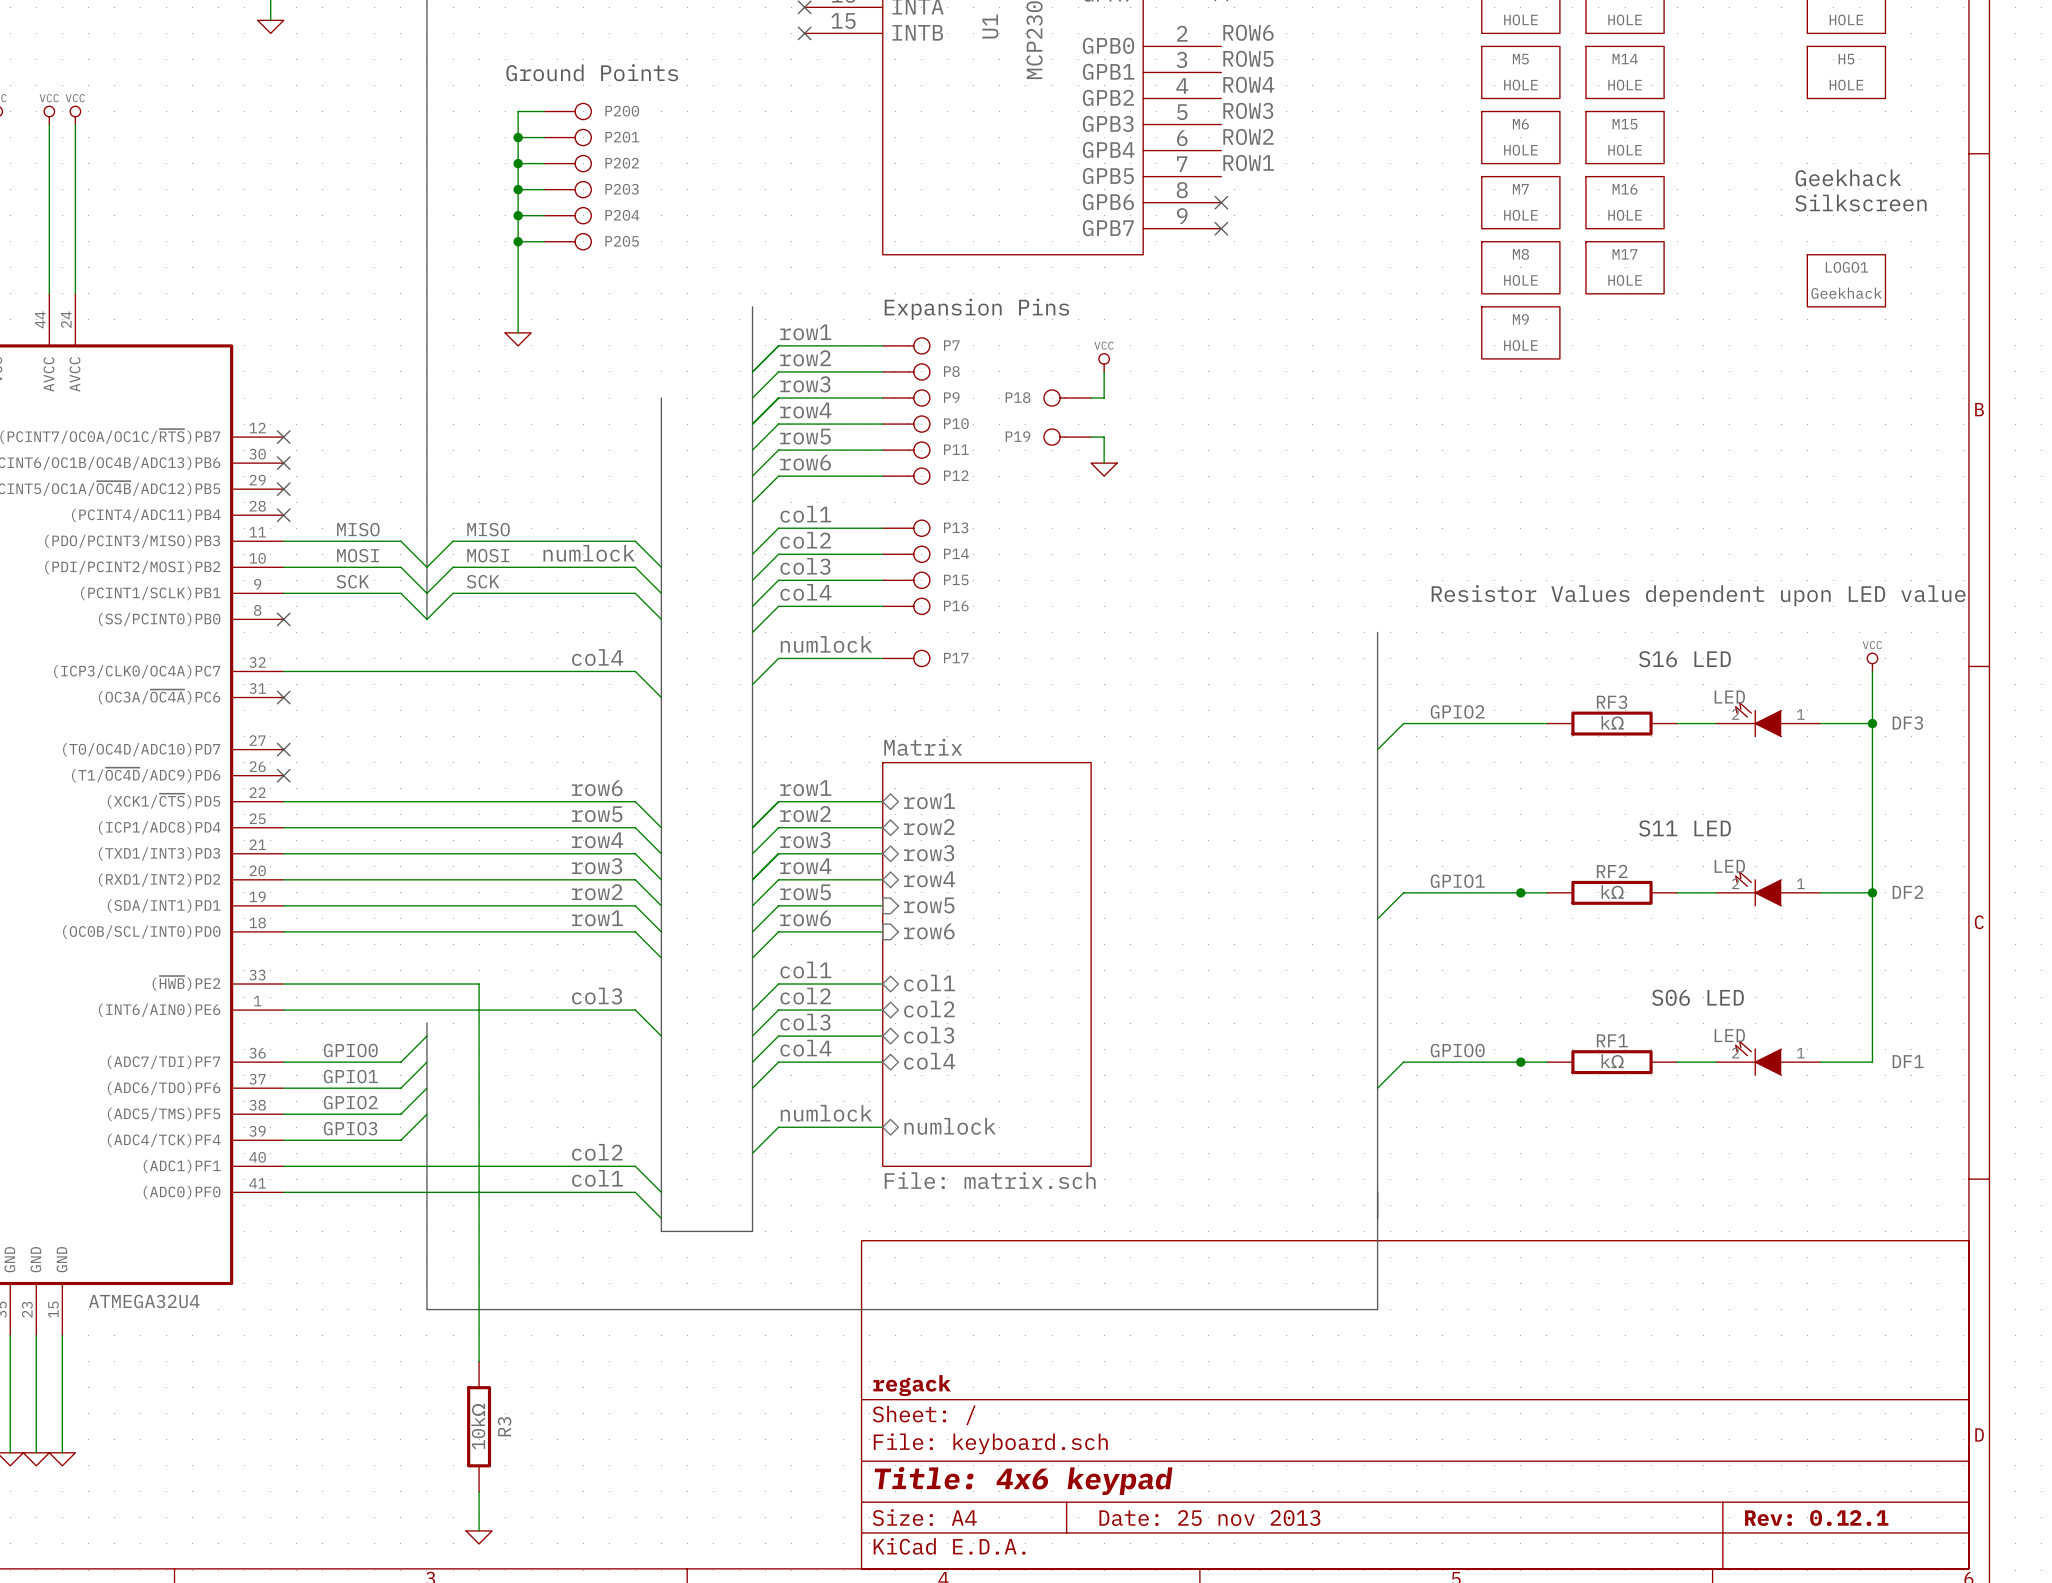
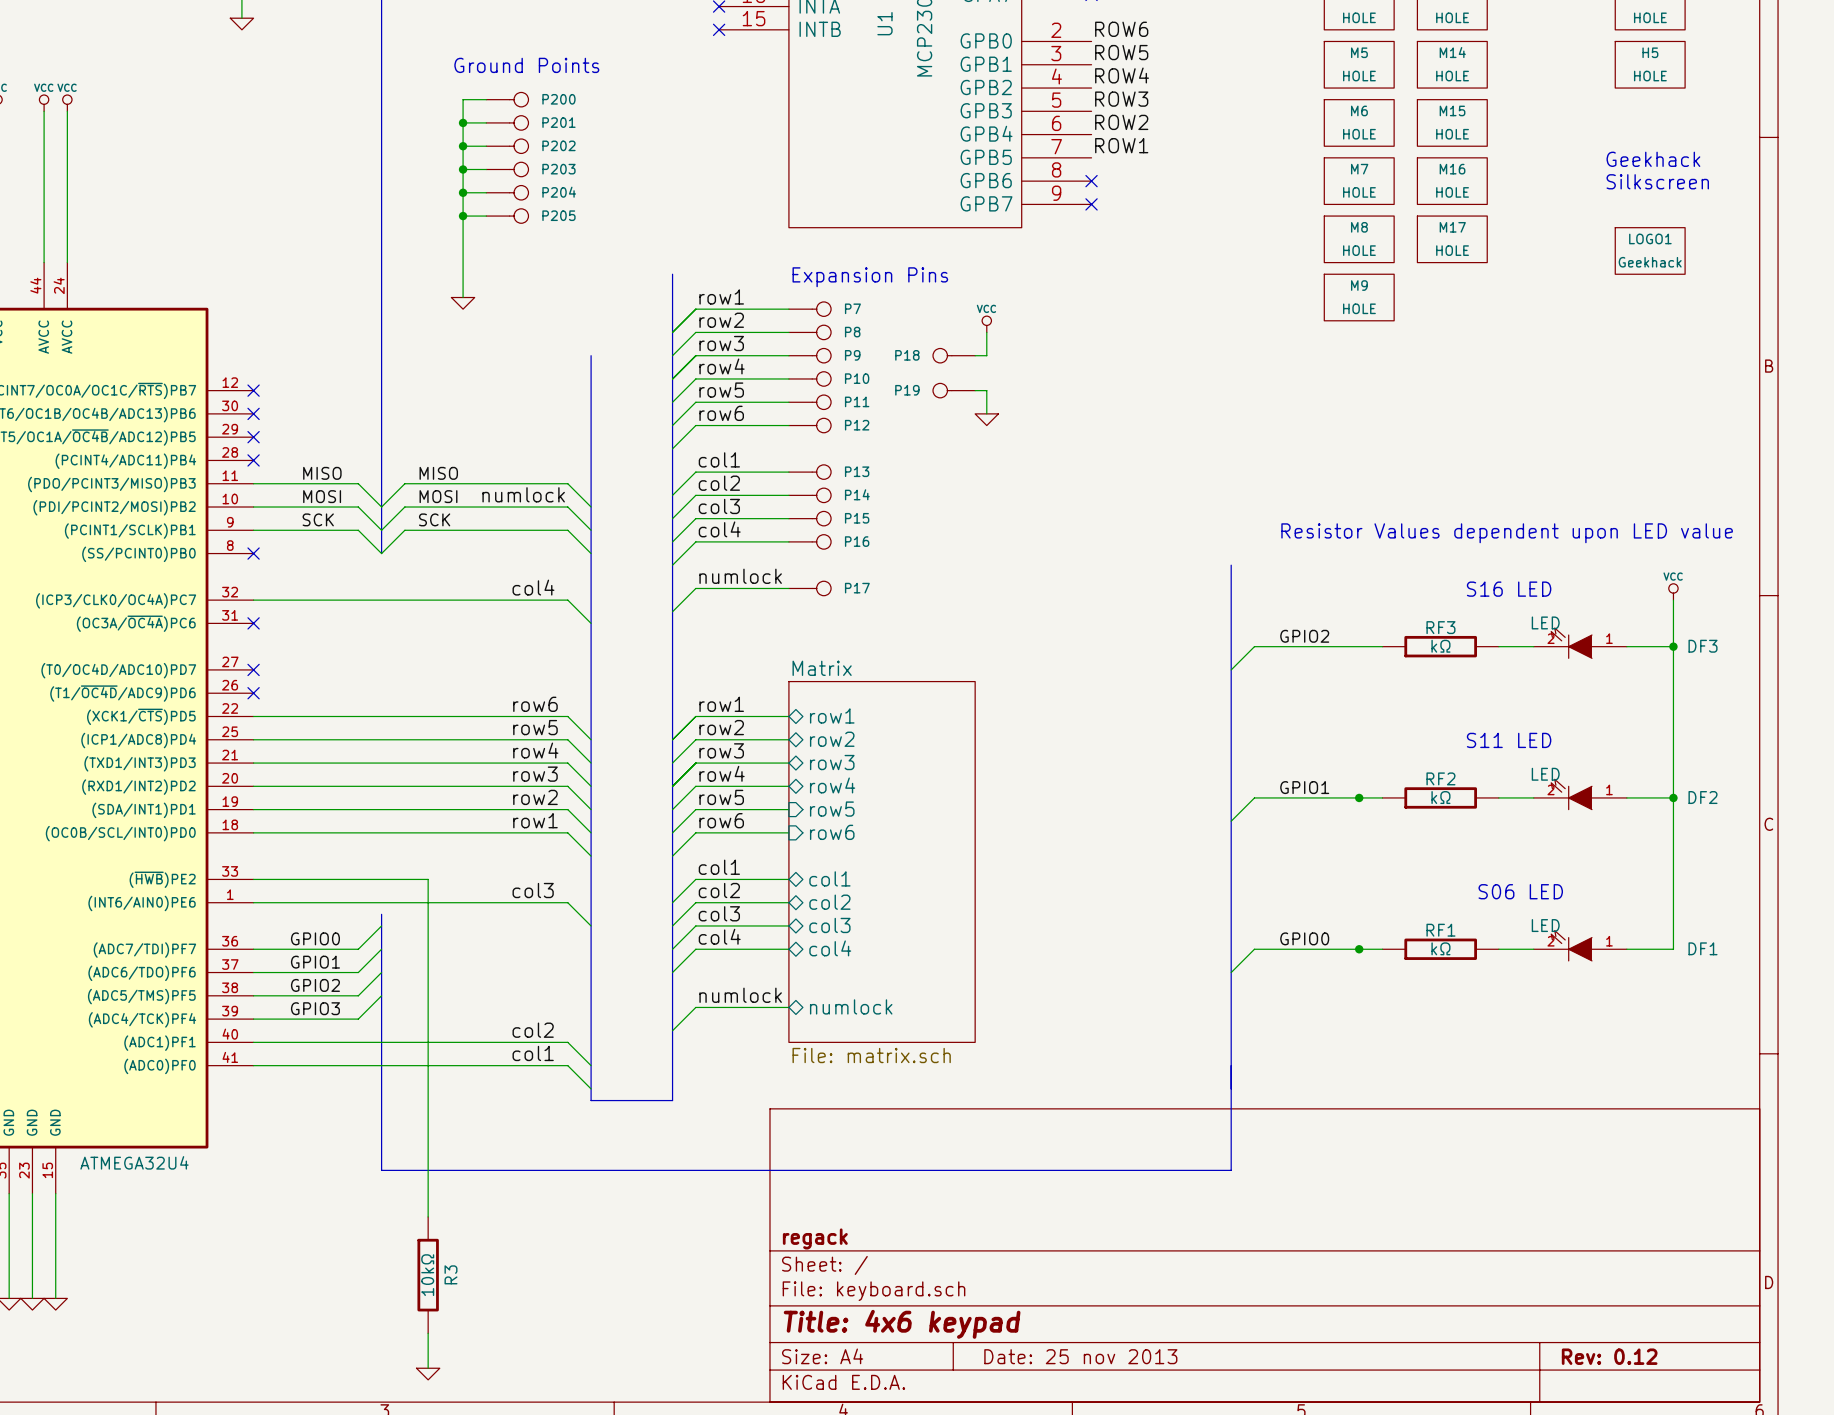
title block: Rev: 0.12.1 (1816, 1518) -> Rev: 0.12 (1609, 1356)

